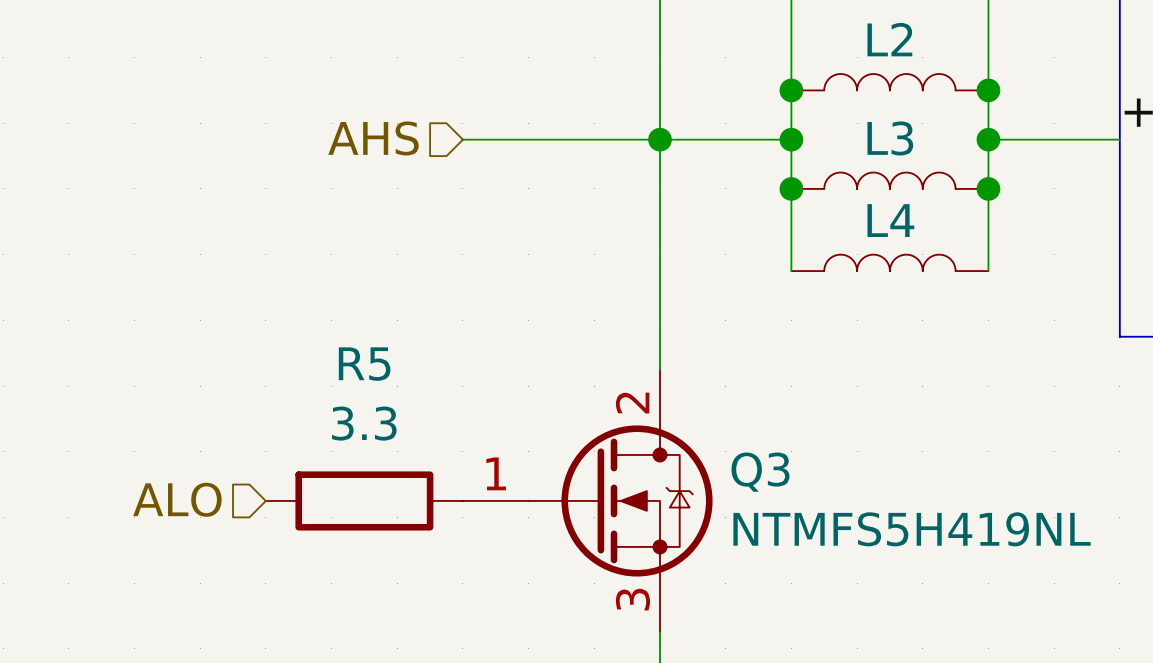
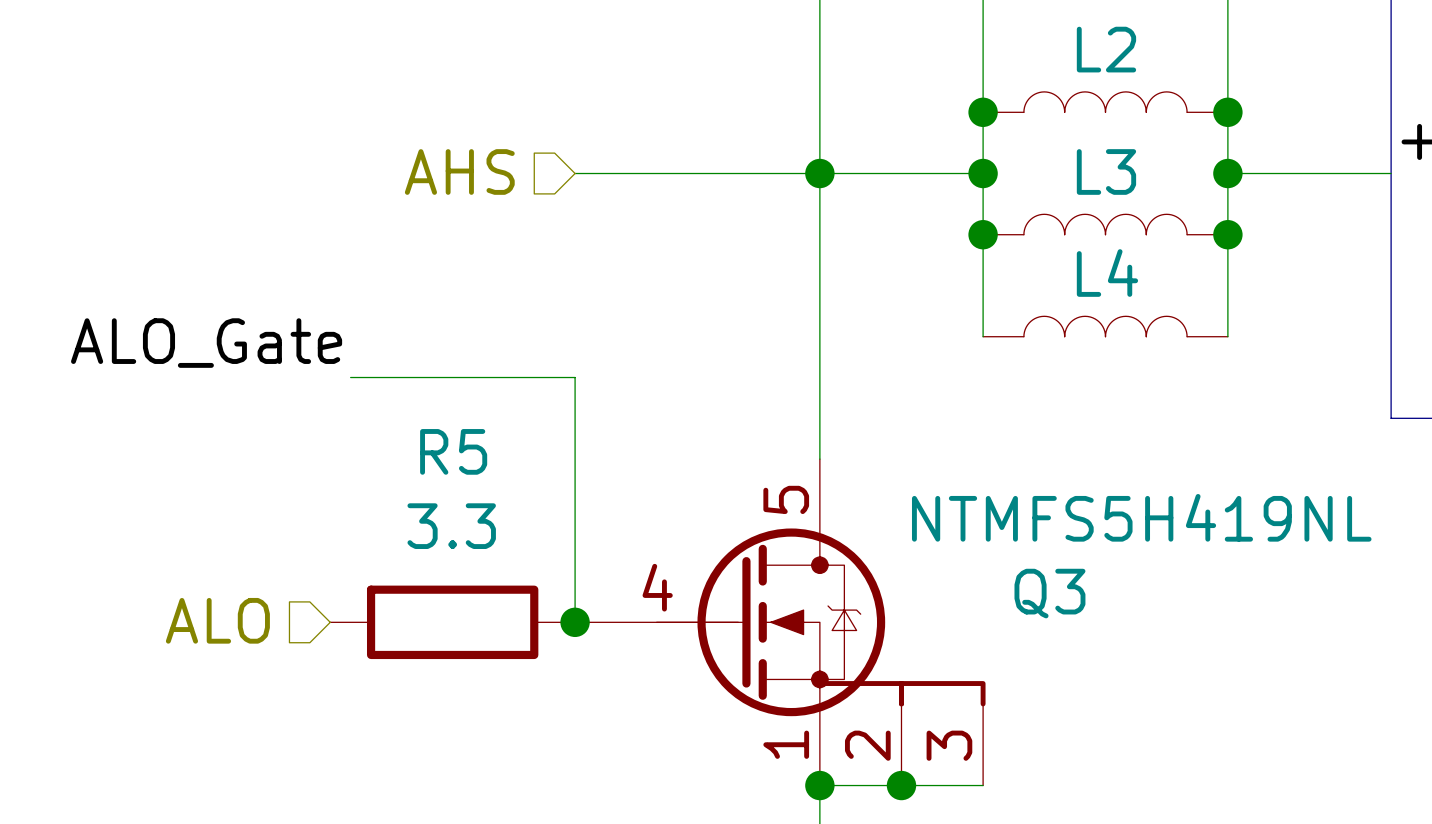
label: none -> ALO_Gate (206, 343)
wire: none -> (350, 377) (575, 377) (575, 622)
Q3 symbol: [462, 369, 713, 633] -> [575, 459, 986, 786]
junction: none -> (575, 622)
Q3 value position: NTMFS5H419NL (912, 529) -> NTMFS5H419NL (1141, 517)
wire: none -> (819, 785) (983, 785)
junction: none -> (819, 785)
junction: none -> (901, 785)

